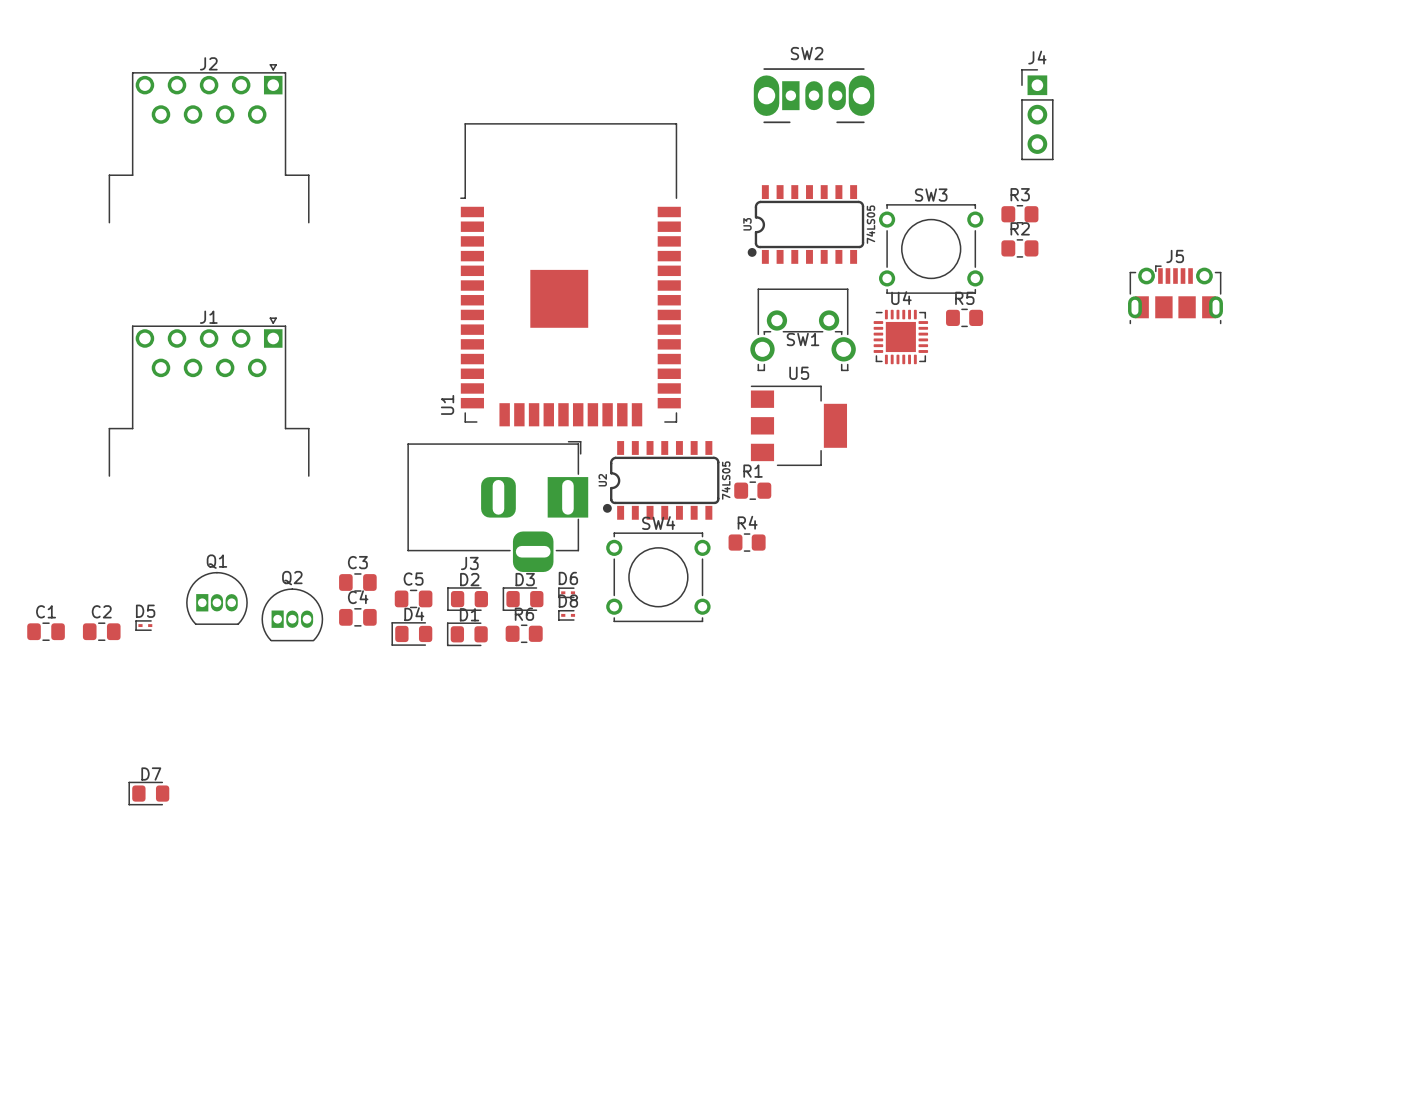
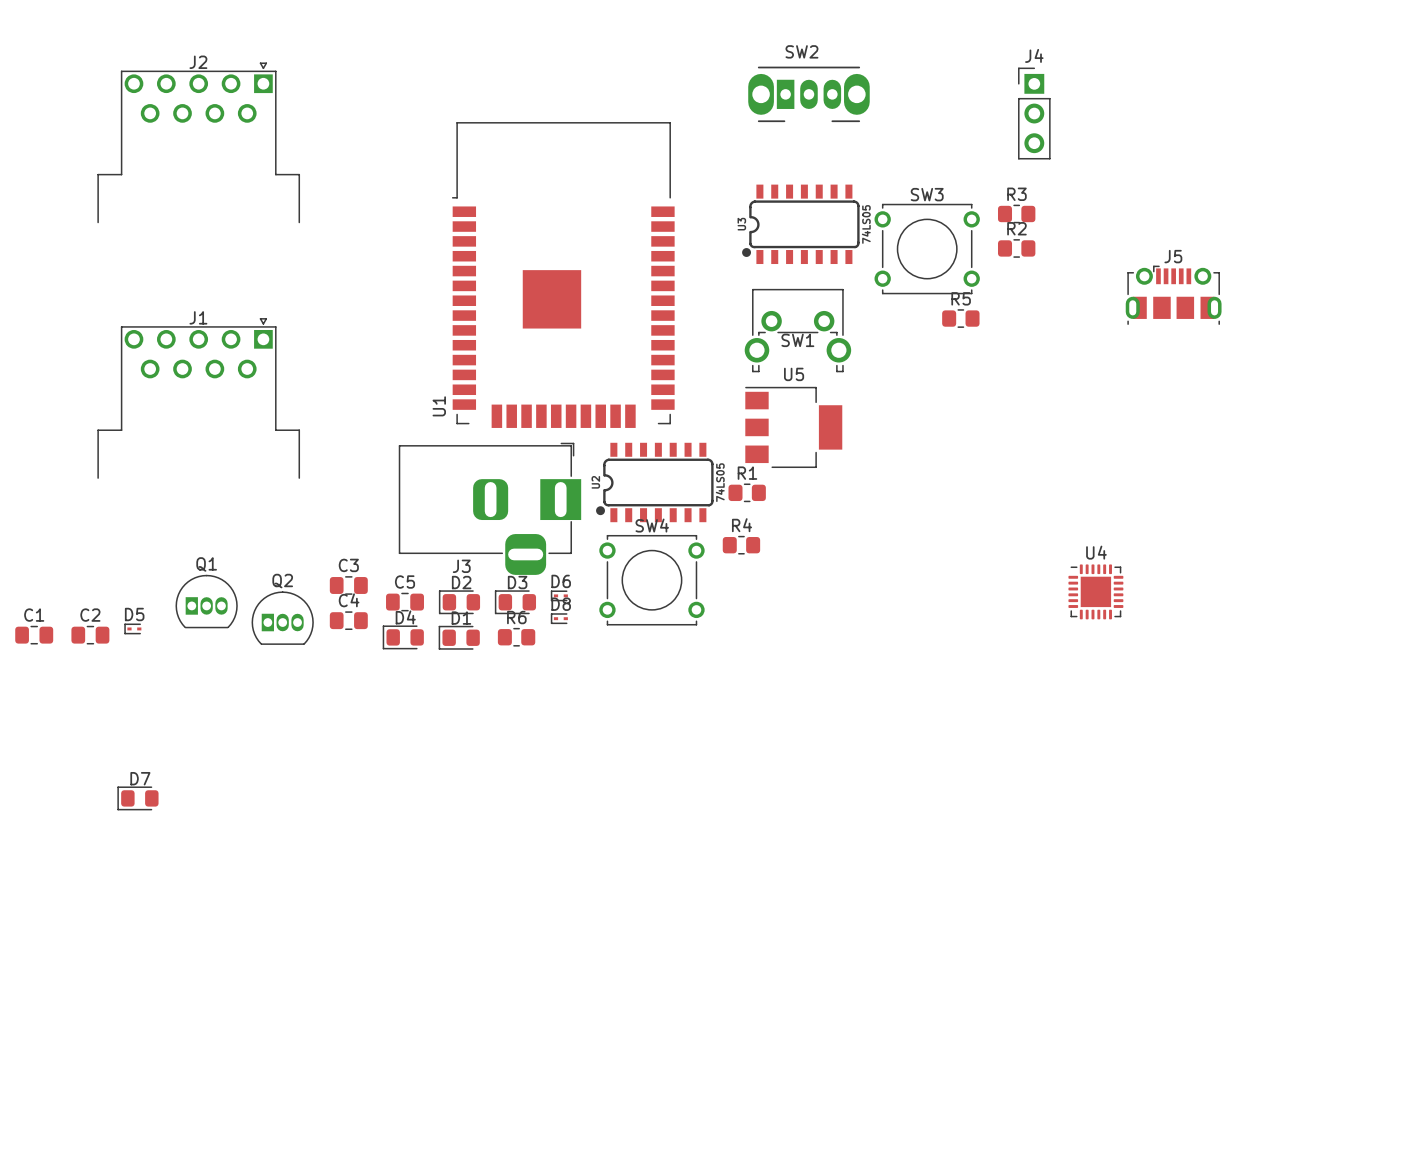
U4 position: (900, 337) -> (1095, 591)

